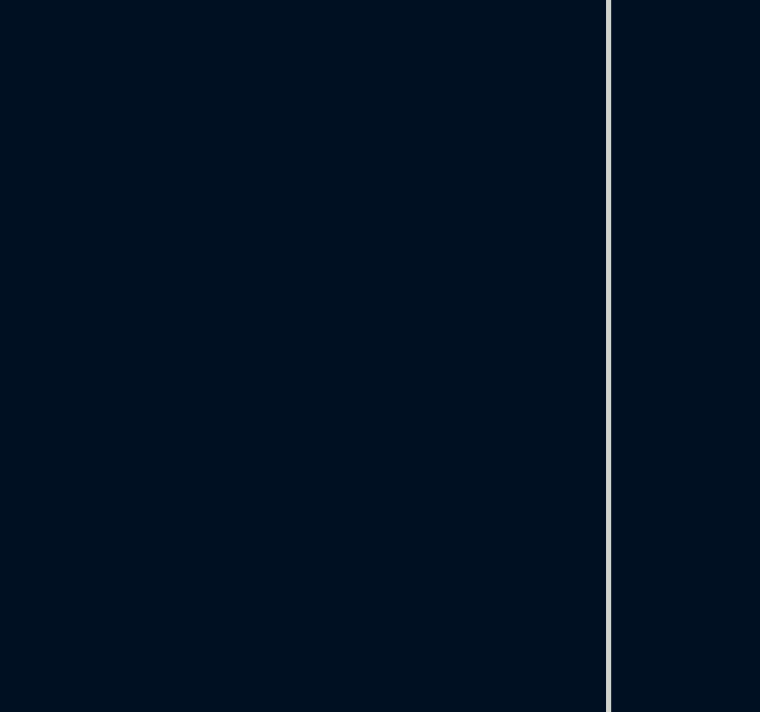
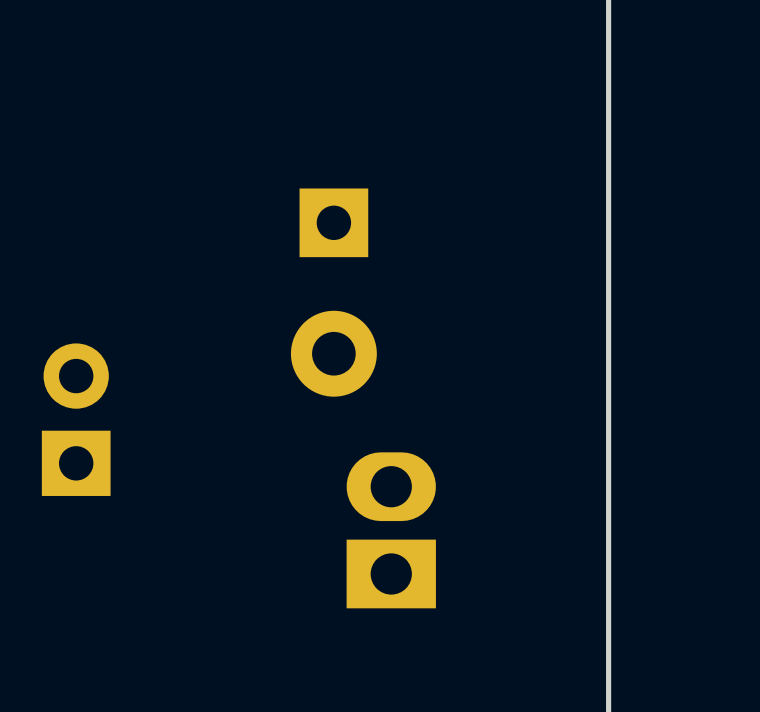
part: none -> (333, 292)
part: none -> (76, 419)
part: none -> (391, 530)

